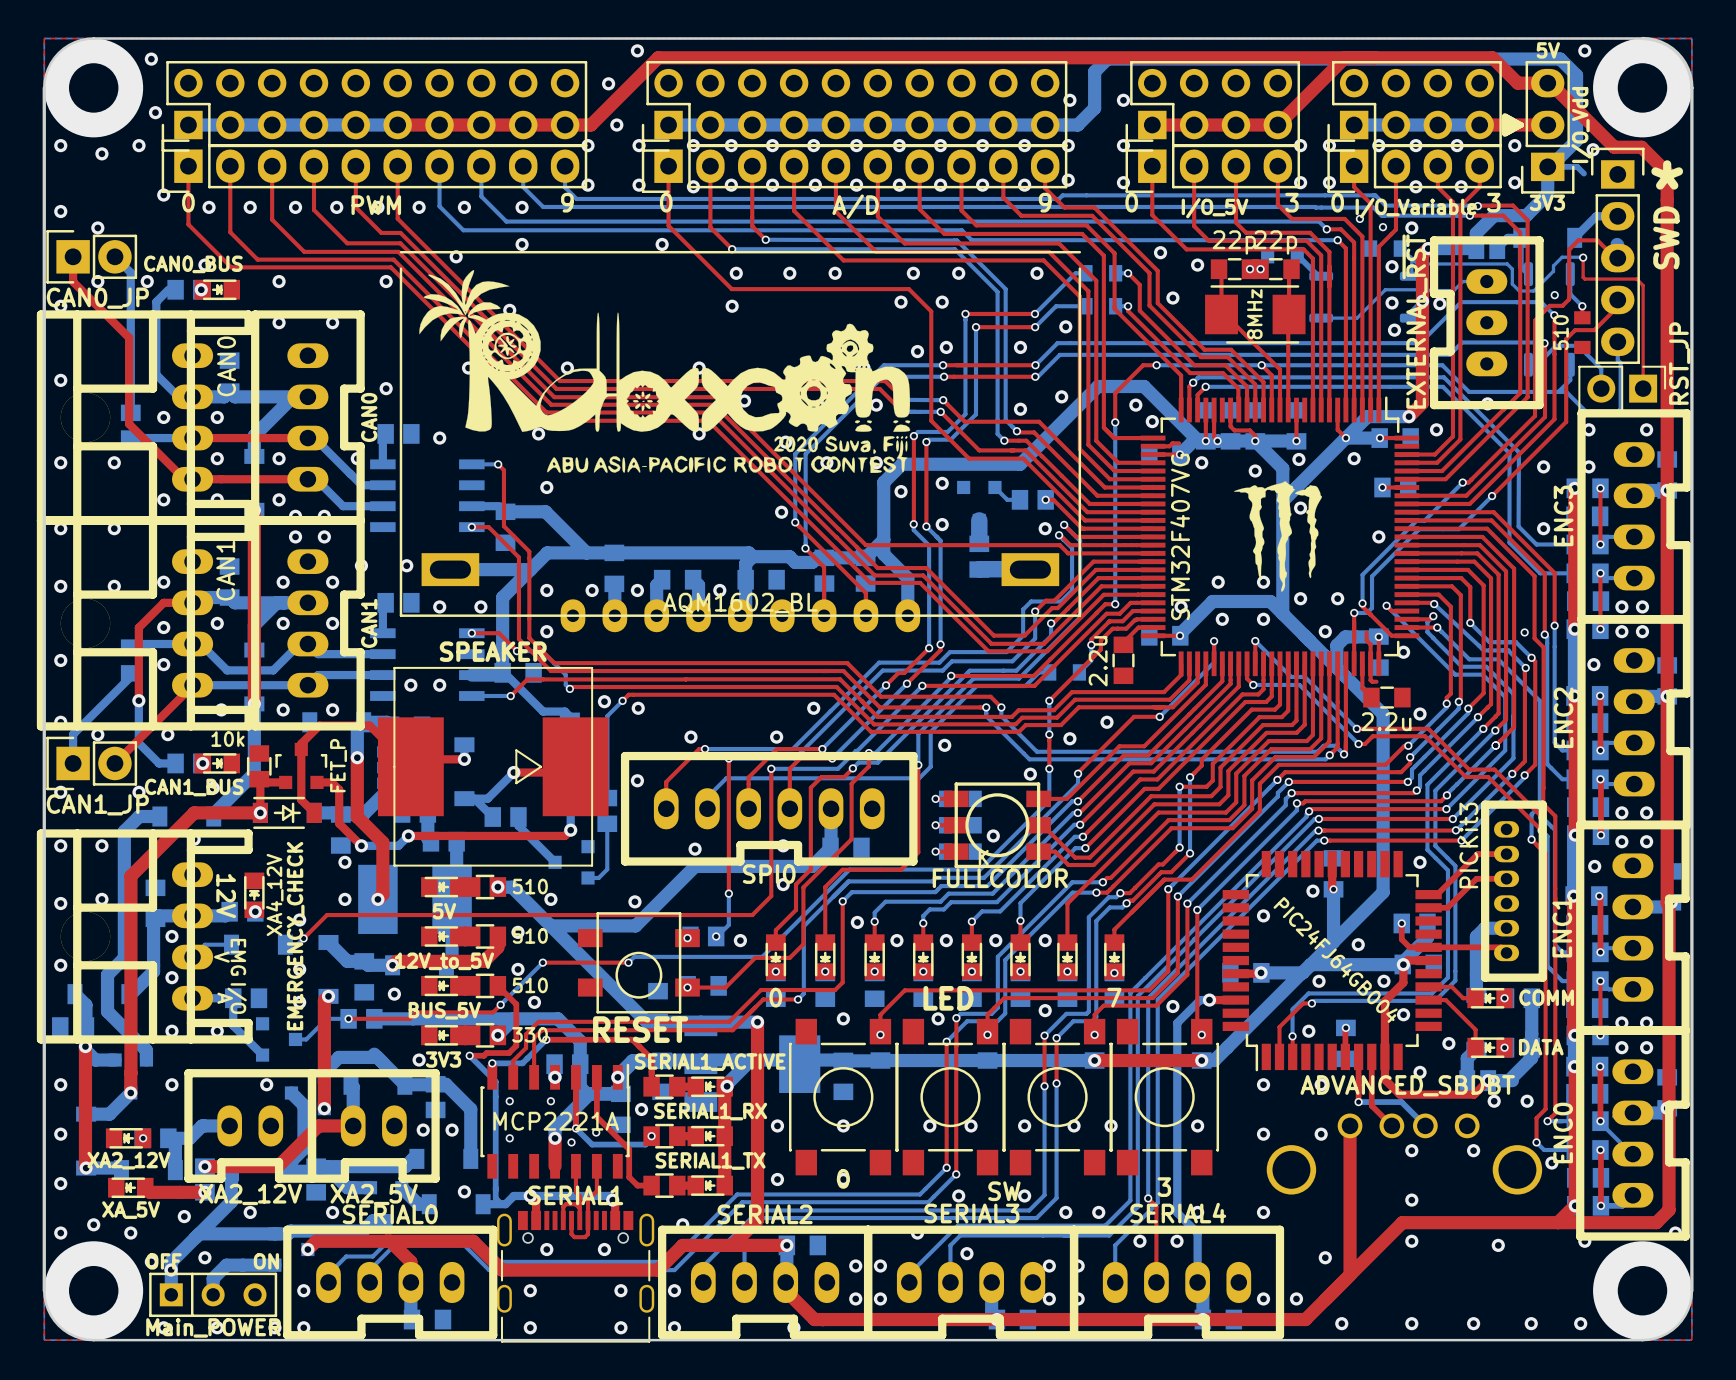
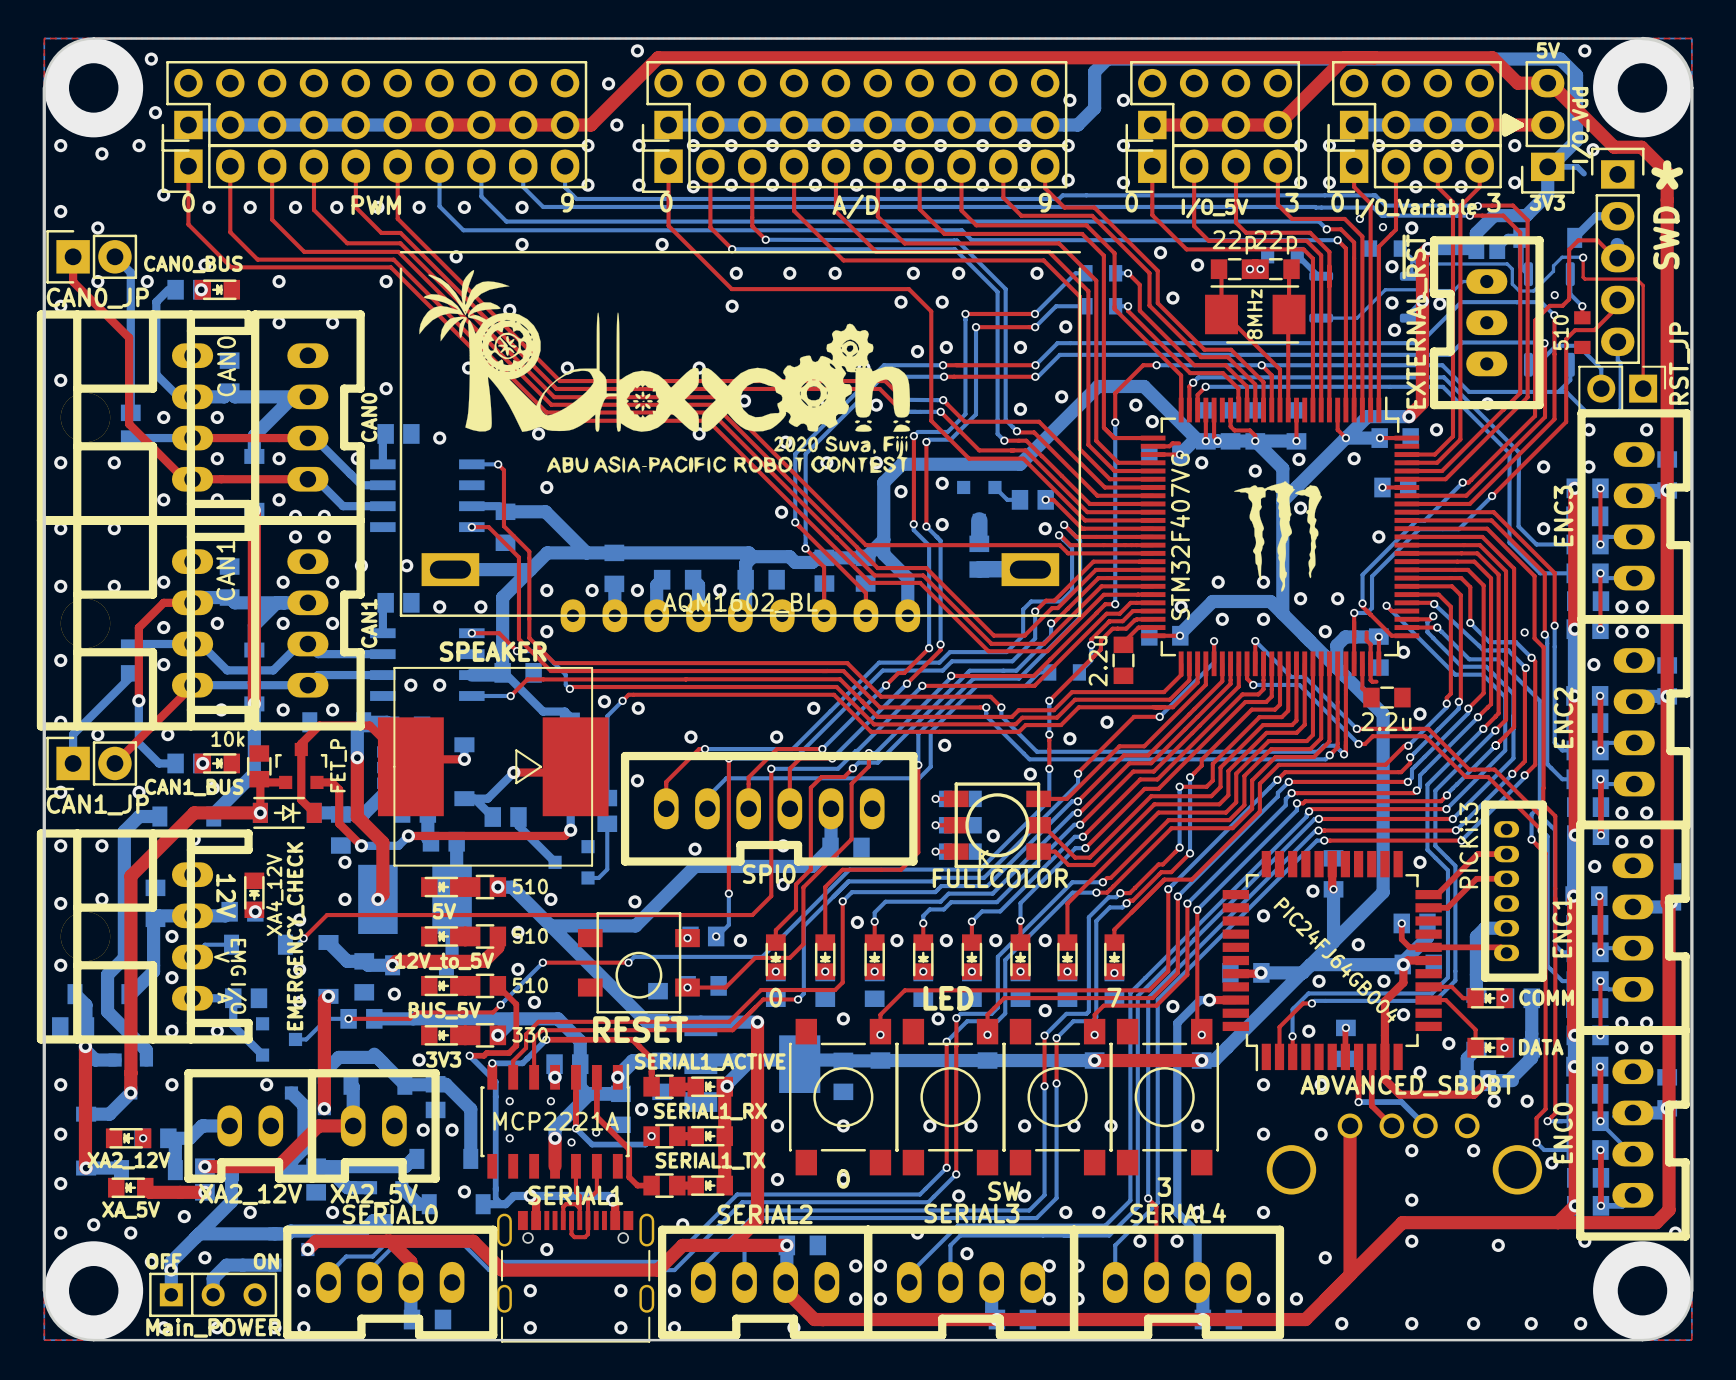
via: (604, 1249) -> none

